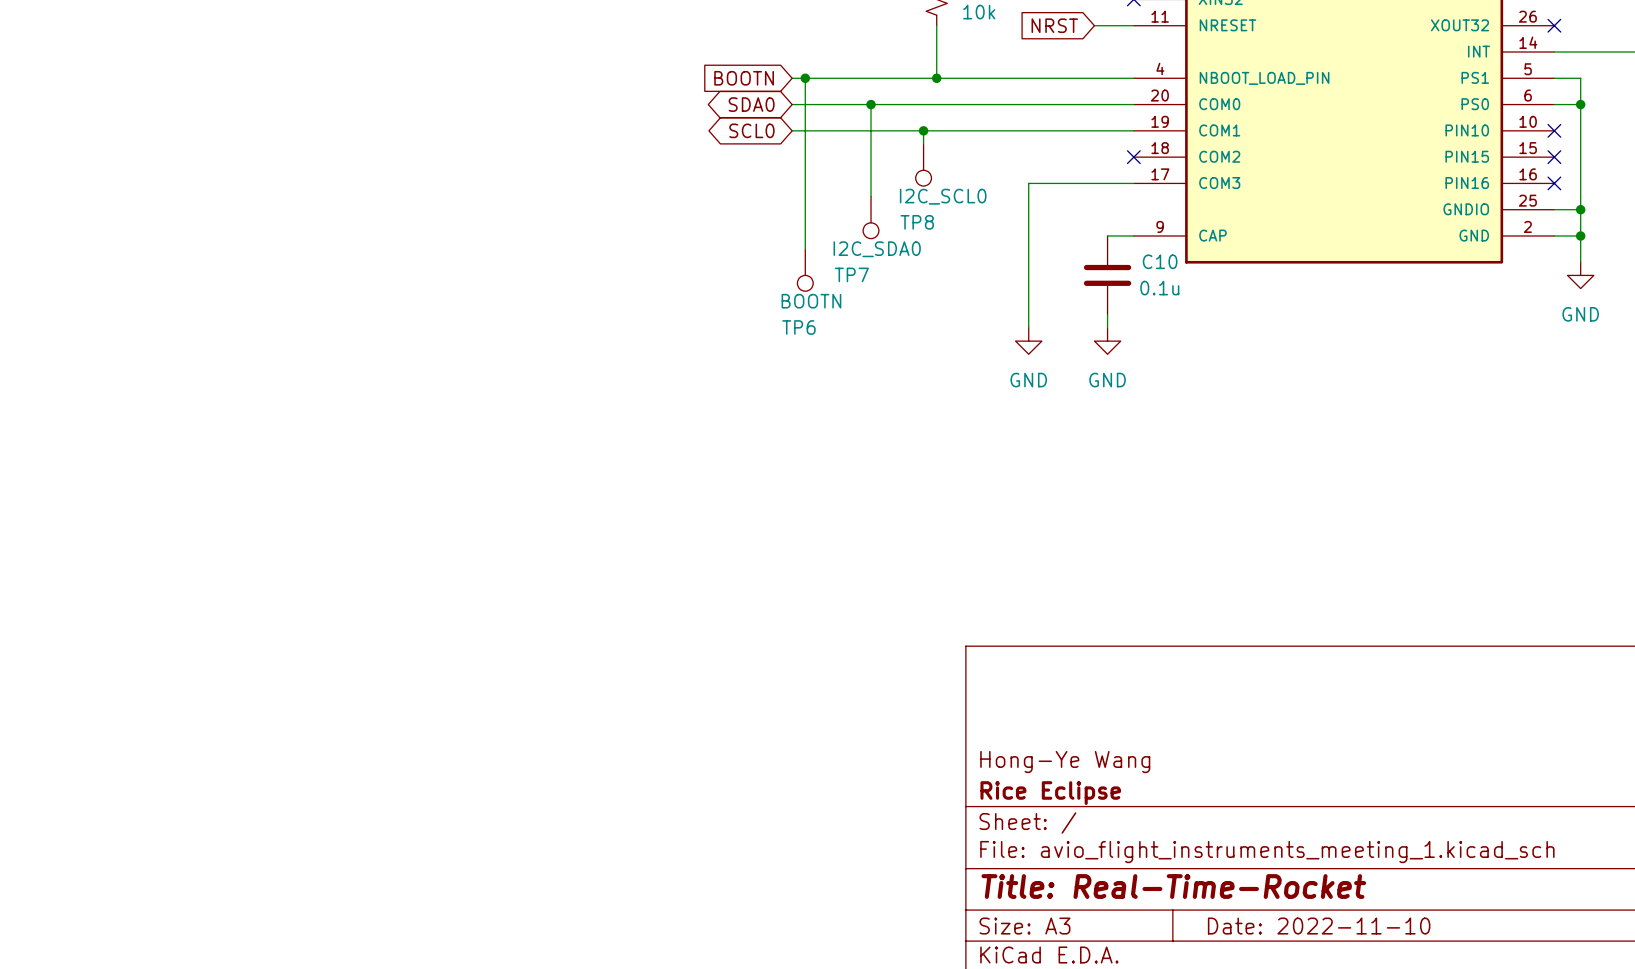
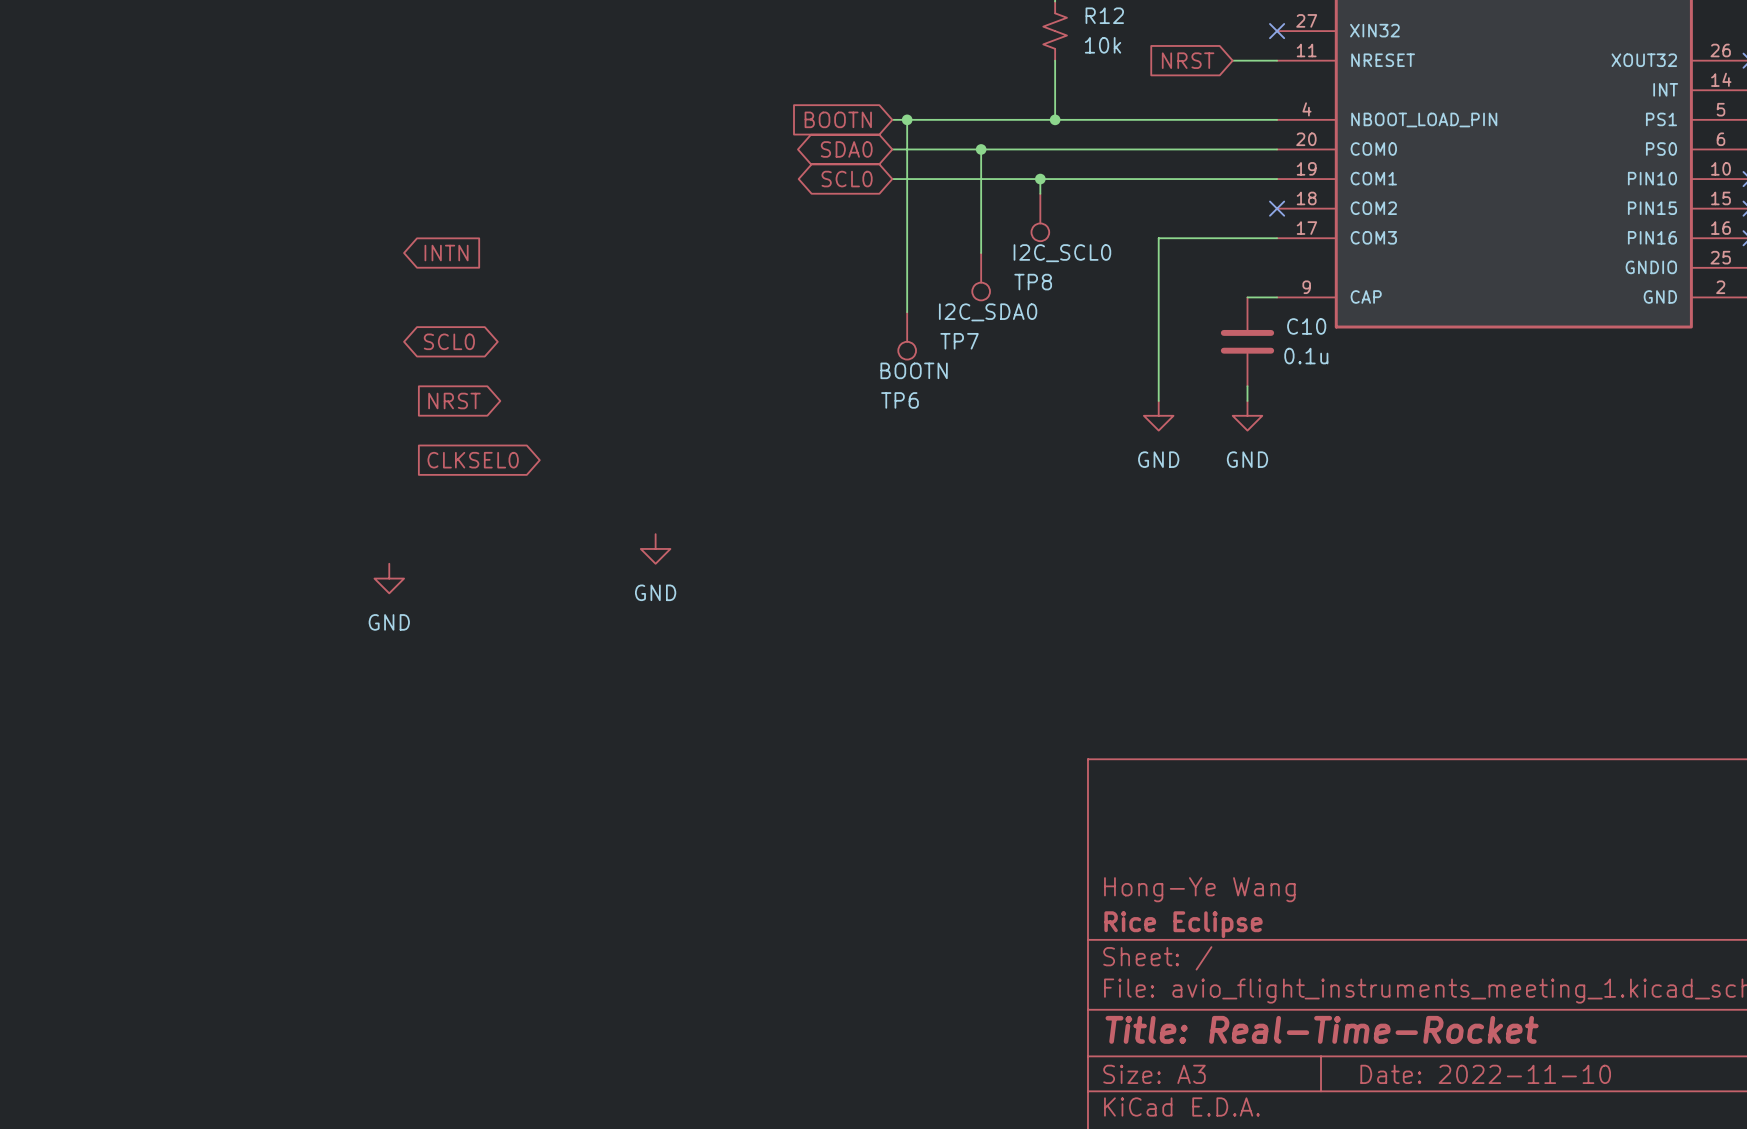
global label: none -> INTN (446, 253)
global label: none -> SCL0 (449, 341)
global label: none -> NRST (454, 401)
global label: none -> CLKSEL0 (473, 460)
power symbol: none -> GND (655, 548)
power symbol: none -> GND (389, 578)

